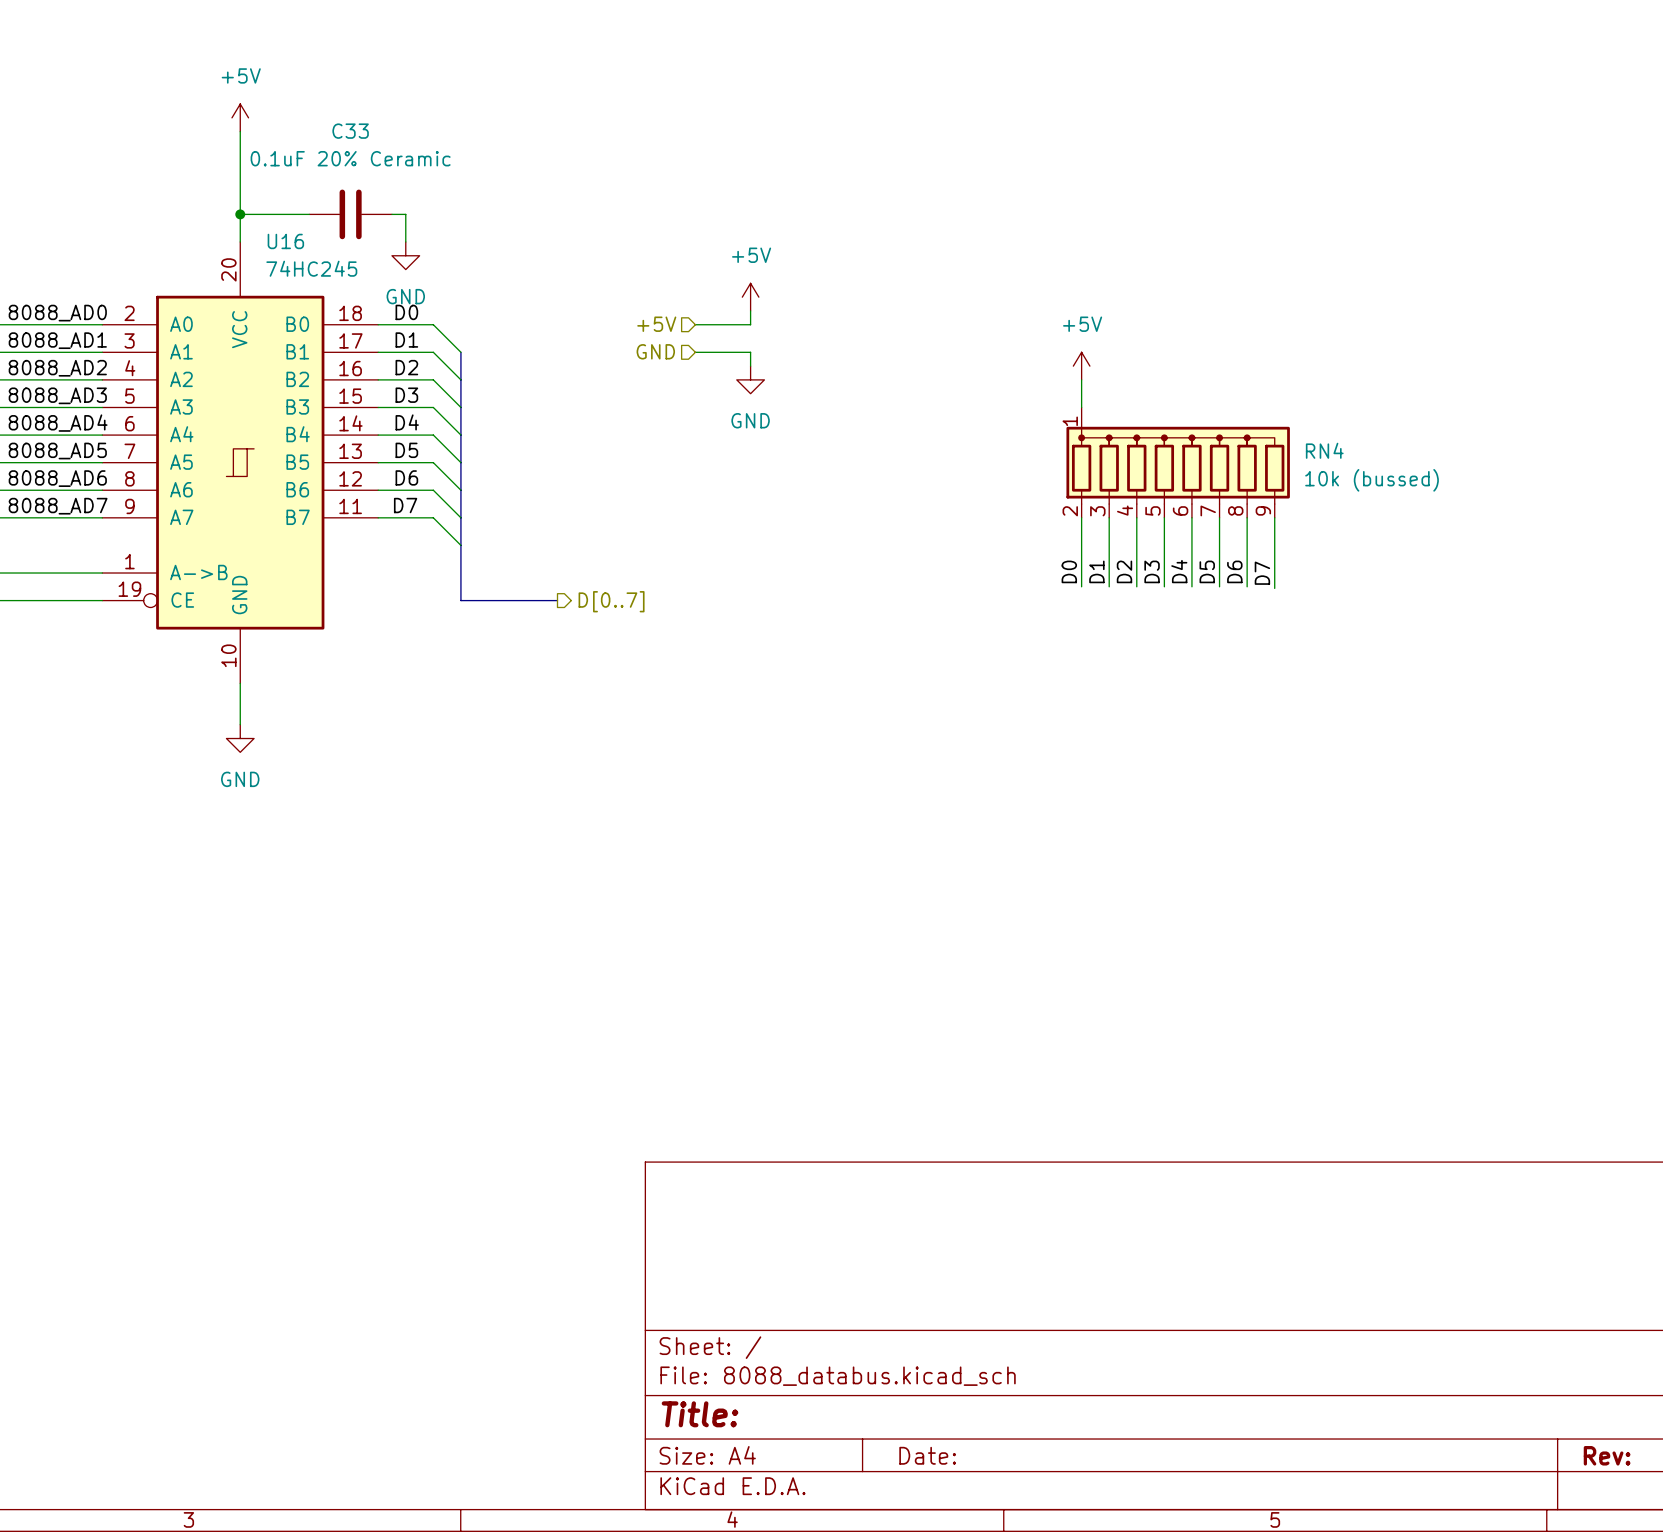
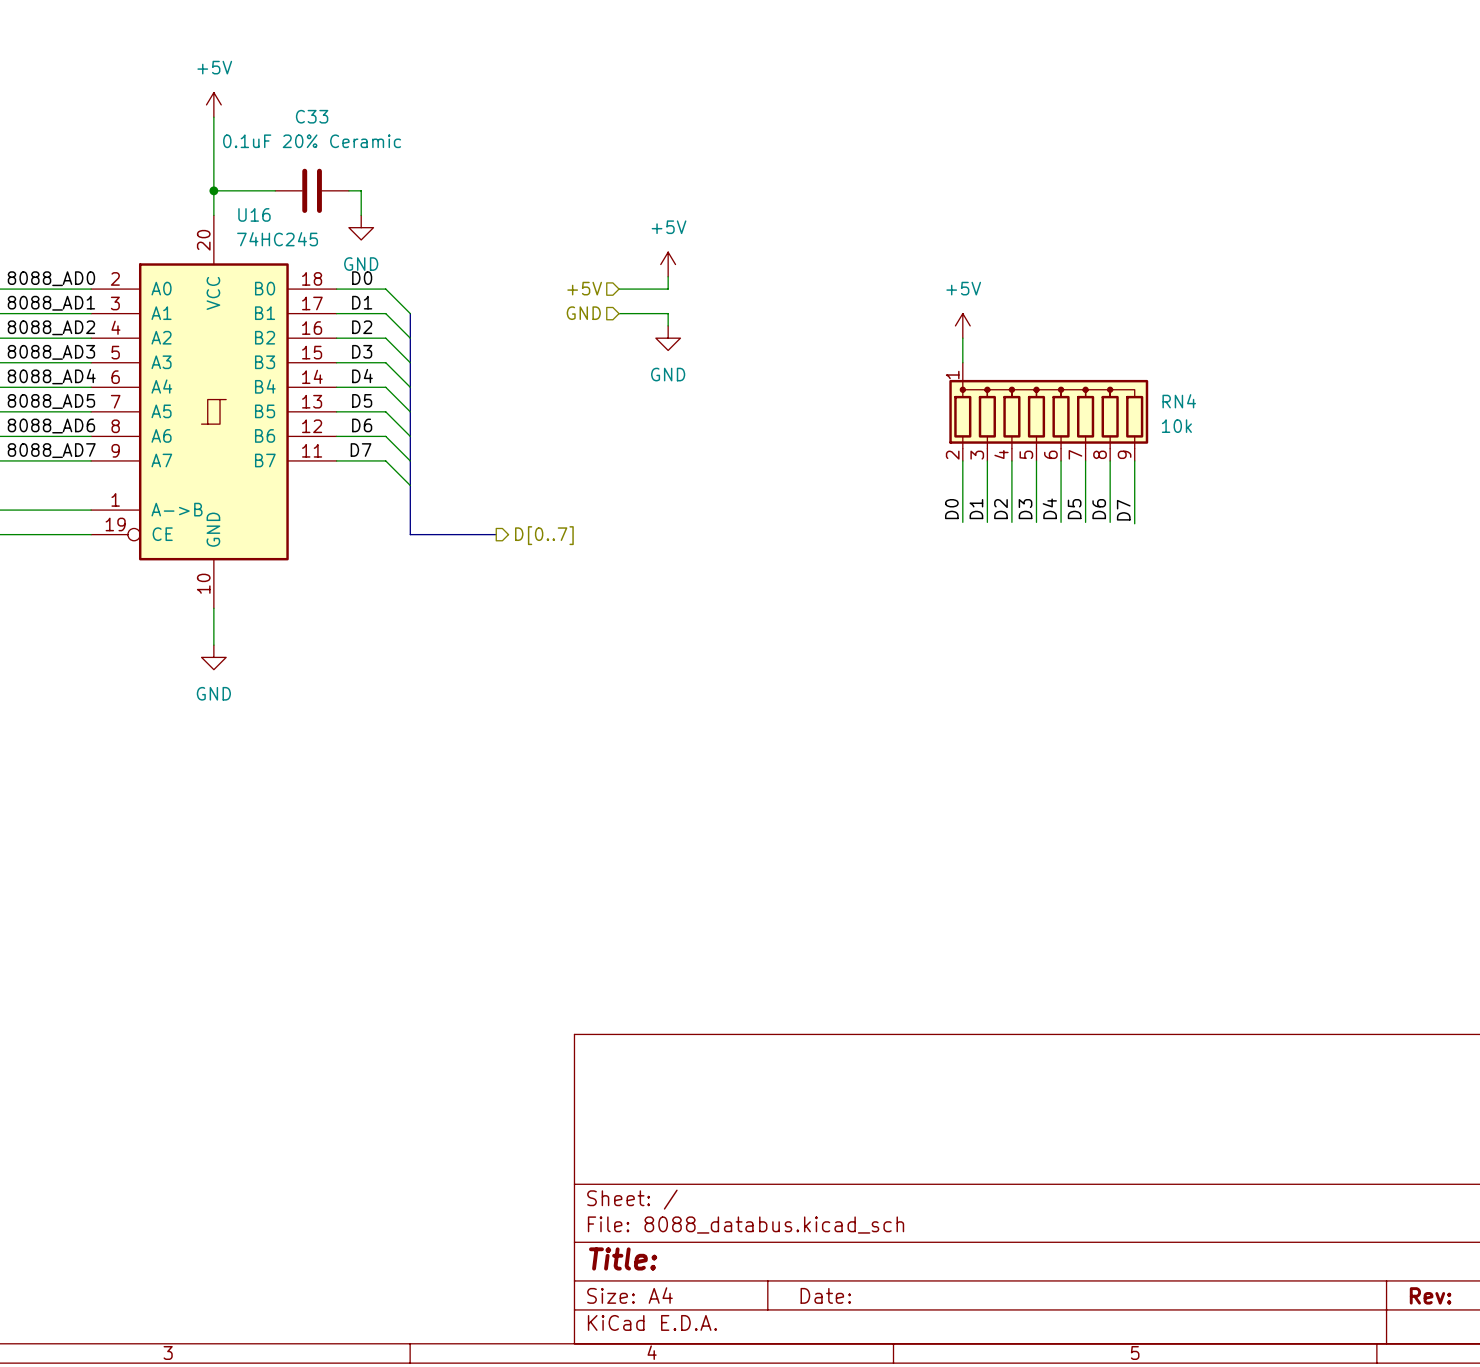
RN4 value: 10k (bussed) (1372, 480) -> 10k (1176, 426)

